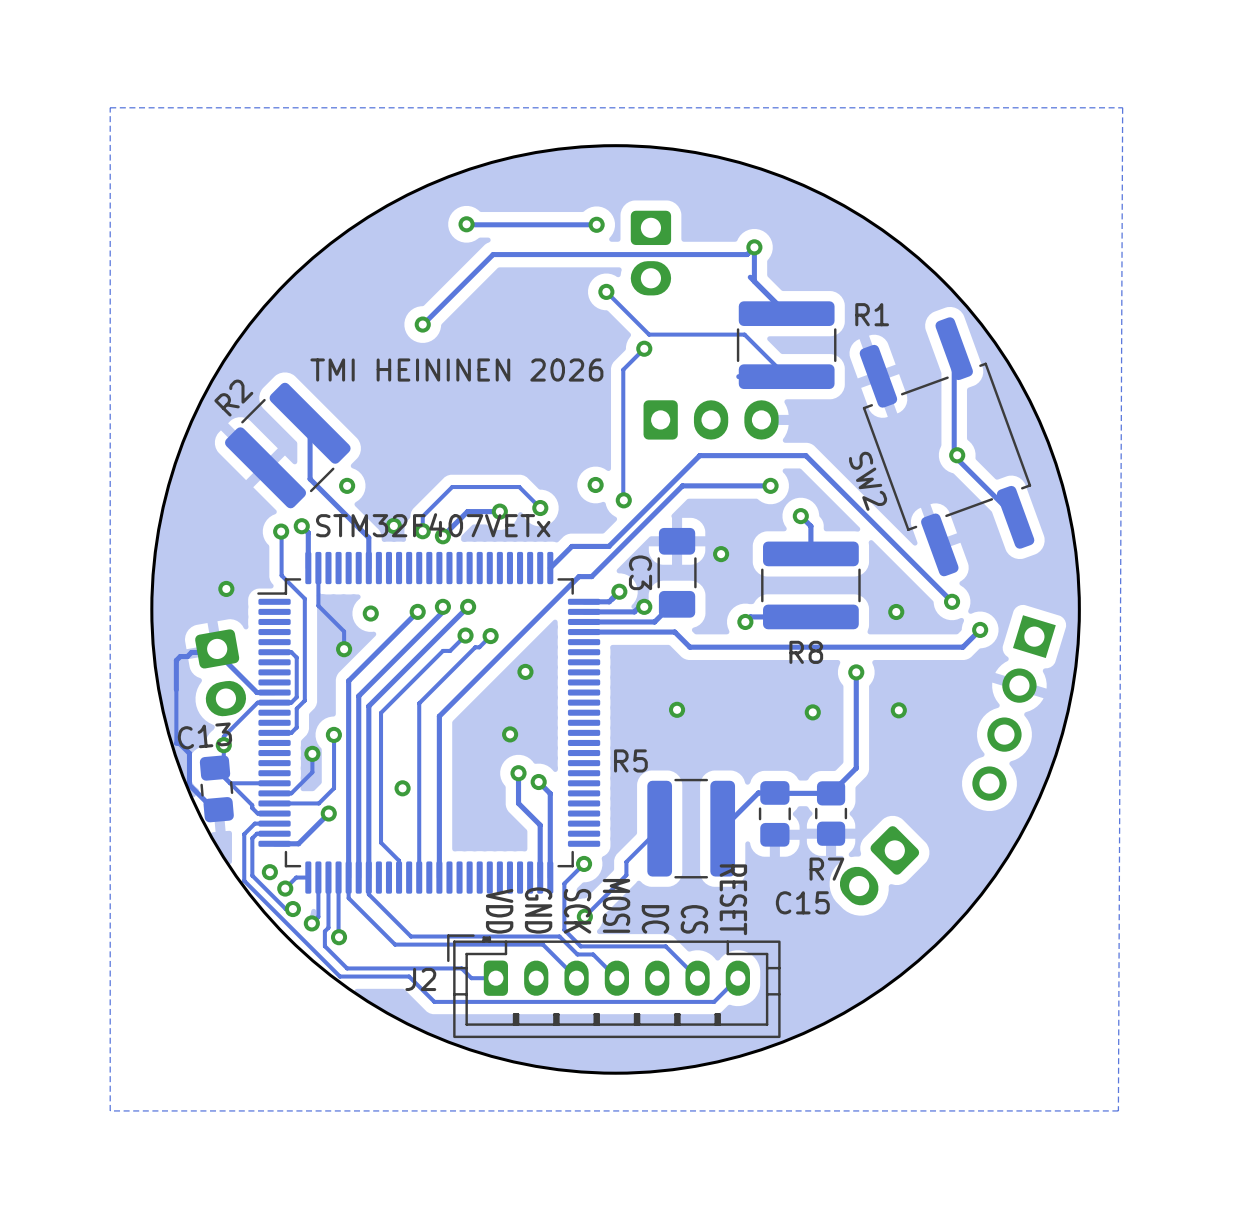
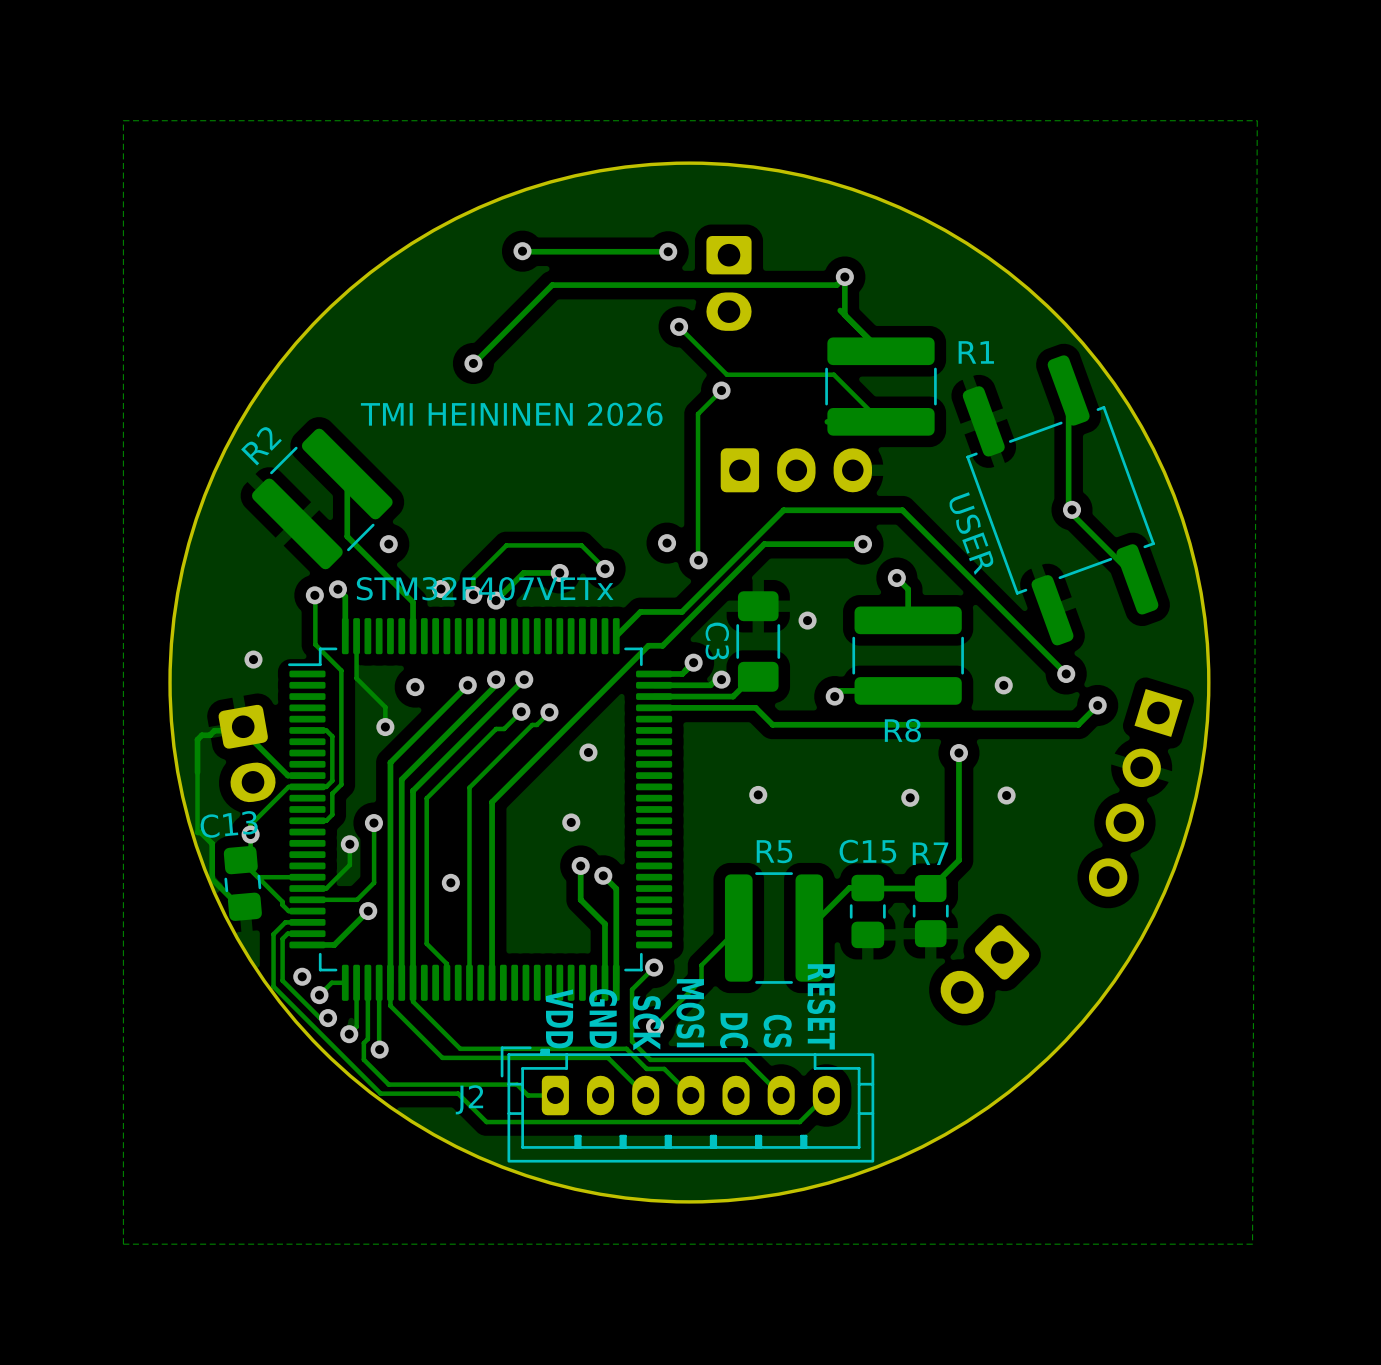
SW2 value: none -> USER (971, 533)
SW2 name: SW2 (868, 481) -> none
R5 name position: R5 (630, 760) -> R5 (774, 851)
R7 name position: R7 (826, 869) -> R7 (930, 853)
C15 name position: C15 (802, 902) -> C15 (867, 851)

